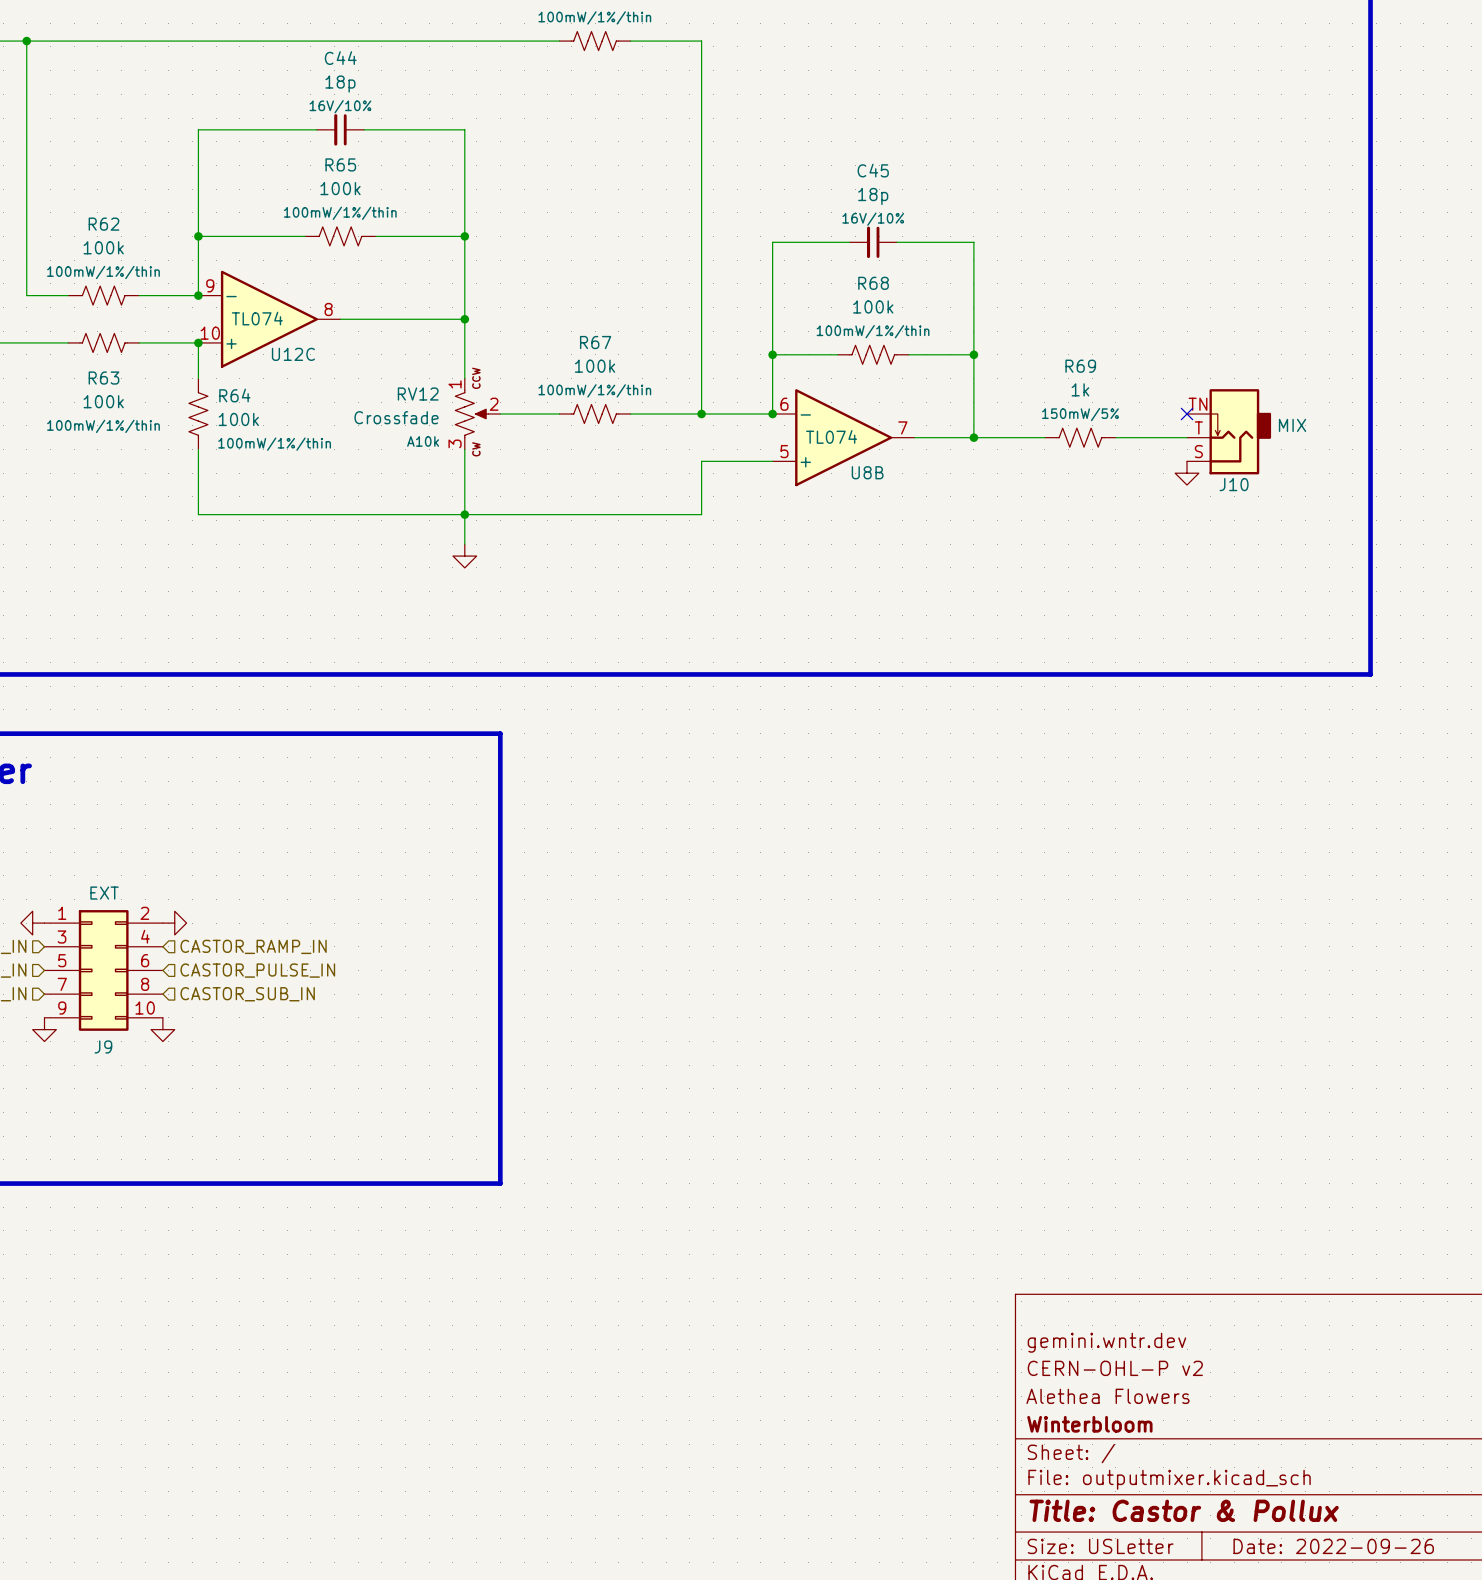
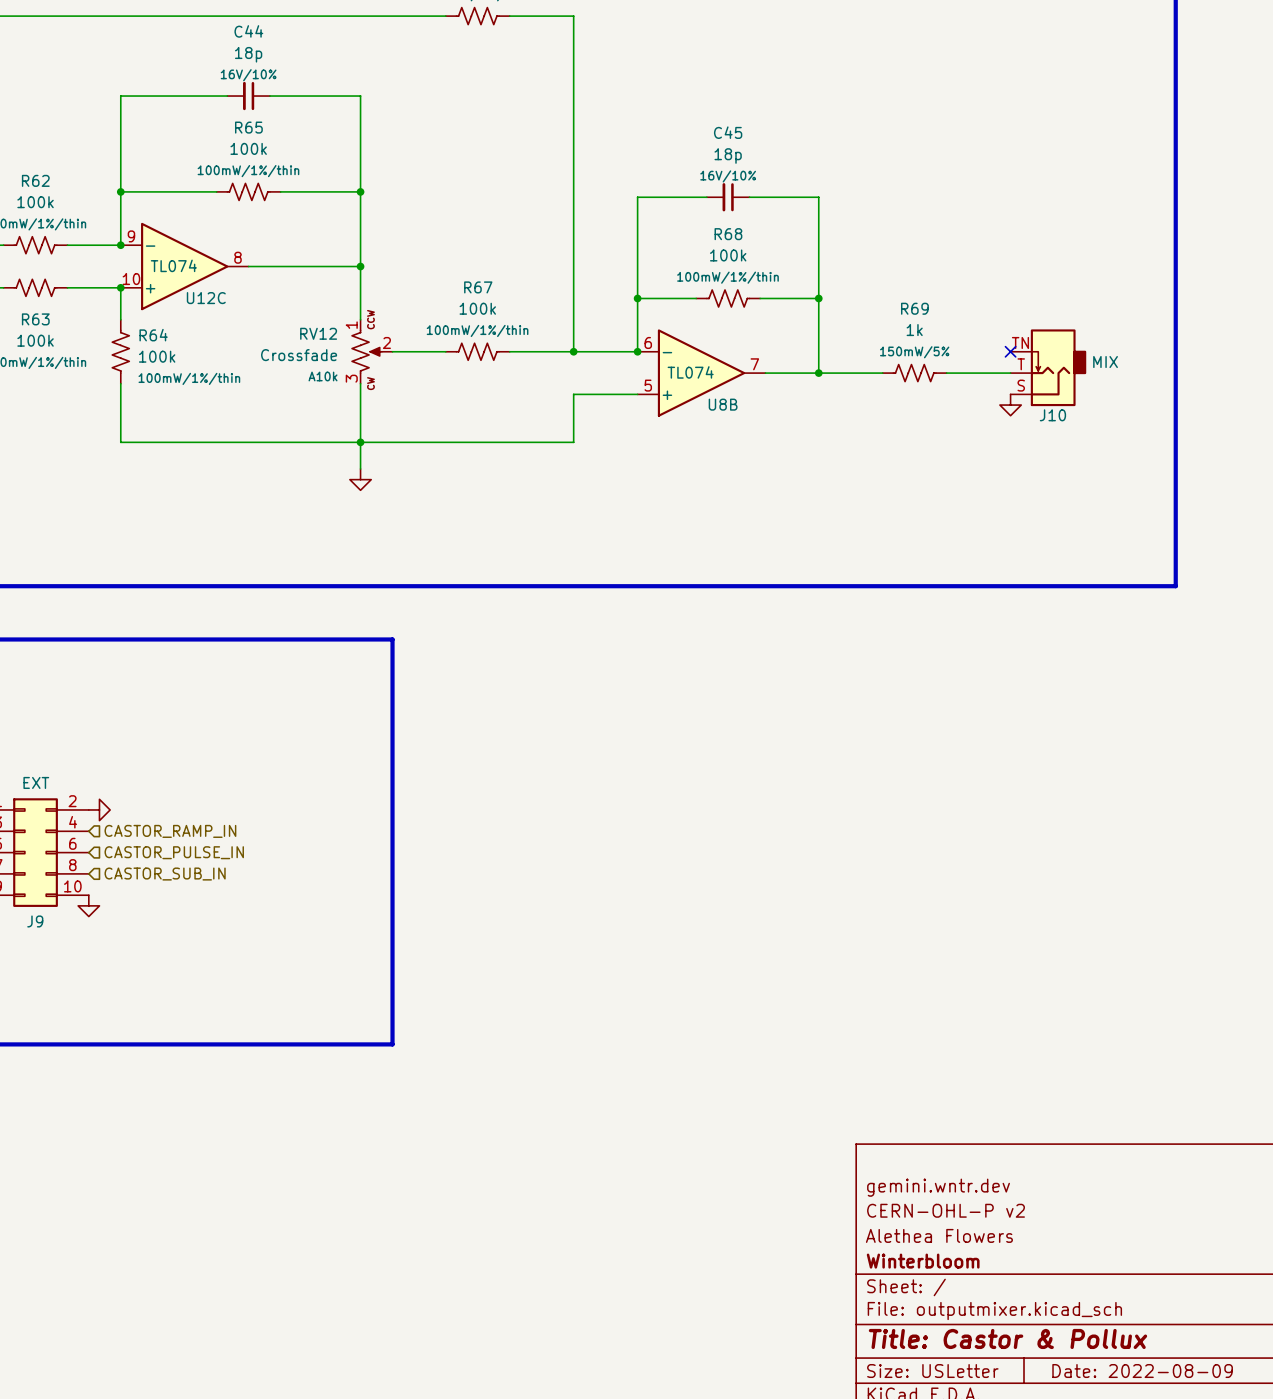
title block: Date: 2022-09-26 (1333, 1546) -> Date: 2022-08-09 (1142, 1371)

